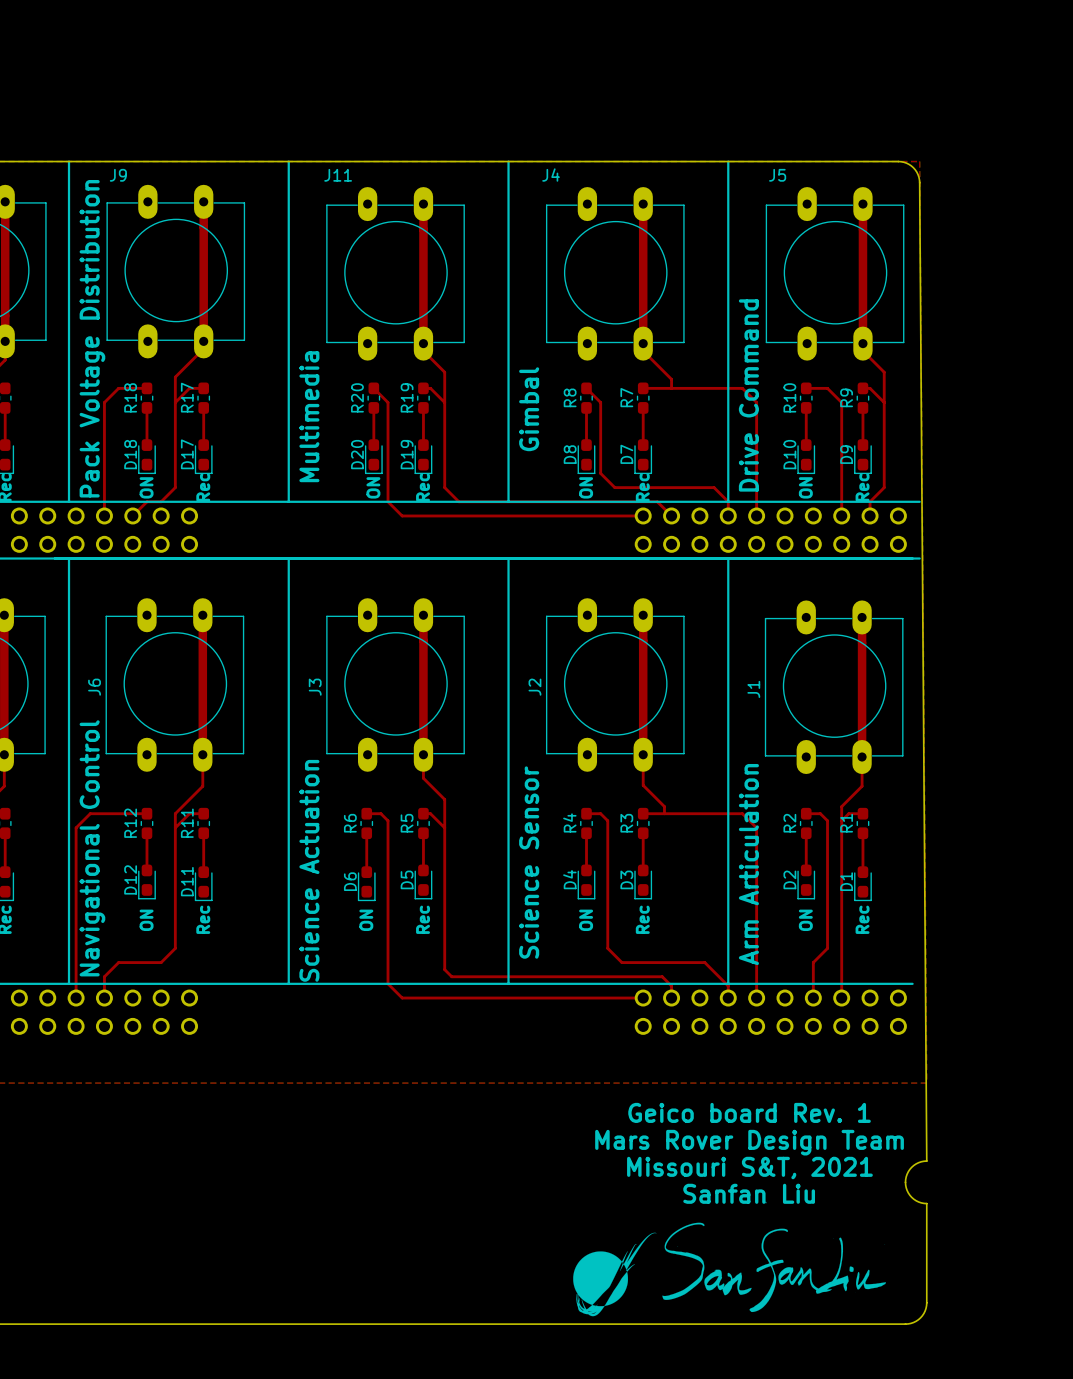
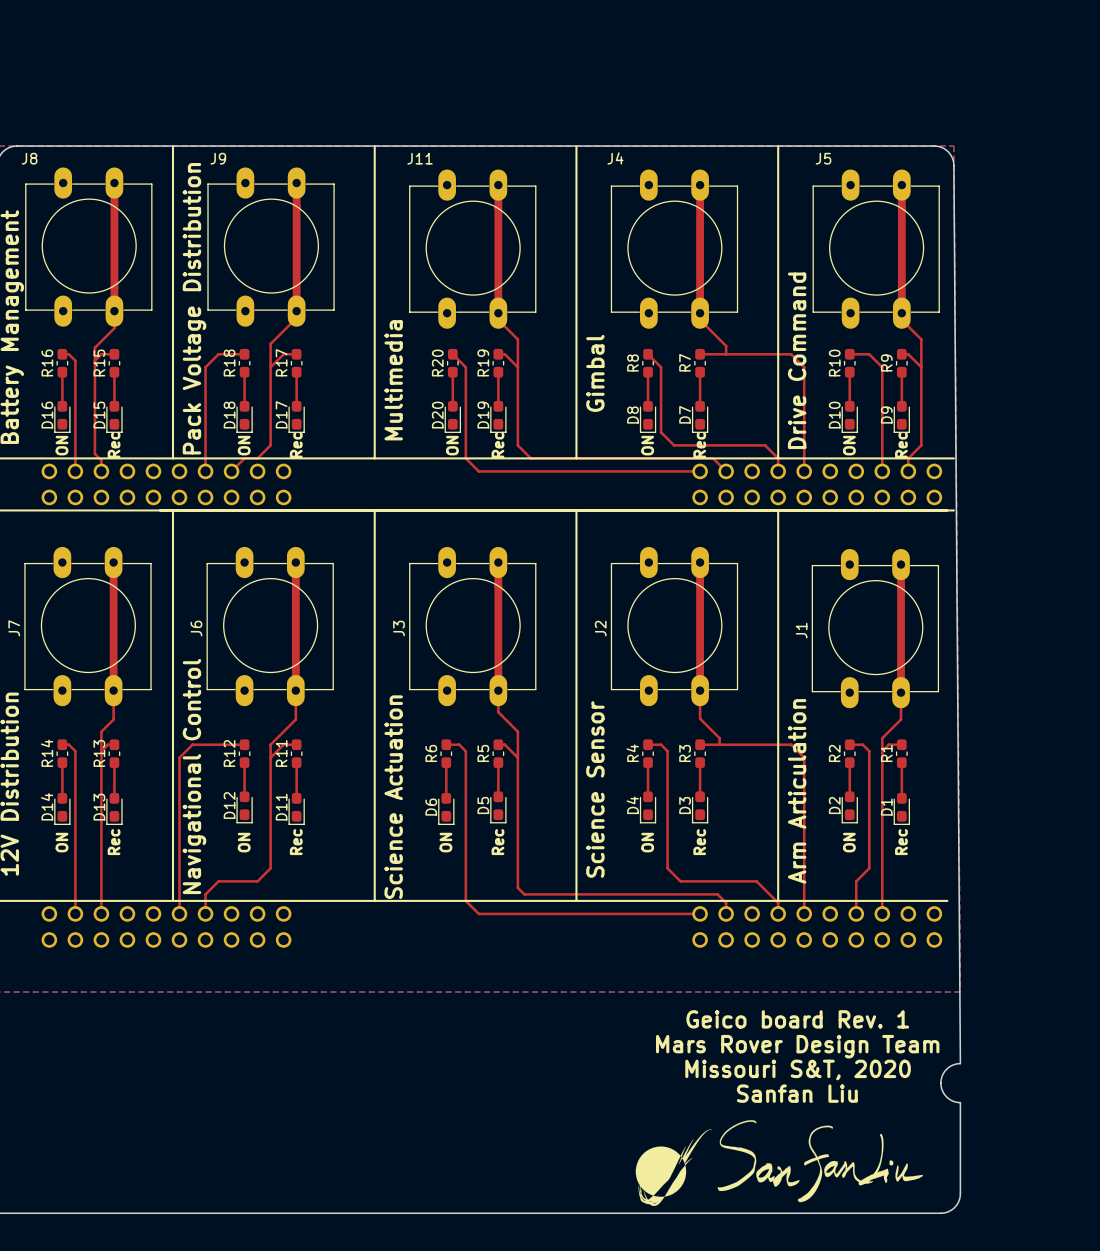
text: Missouri S&T, 2021 (749, 1168) -> Missouri S&T, 2020 (798, 1069)

